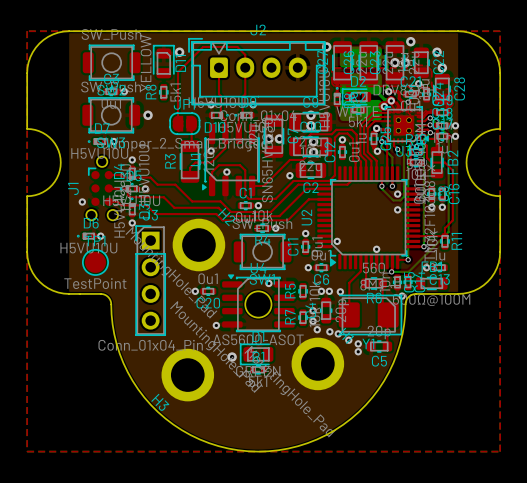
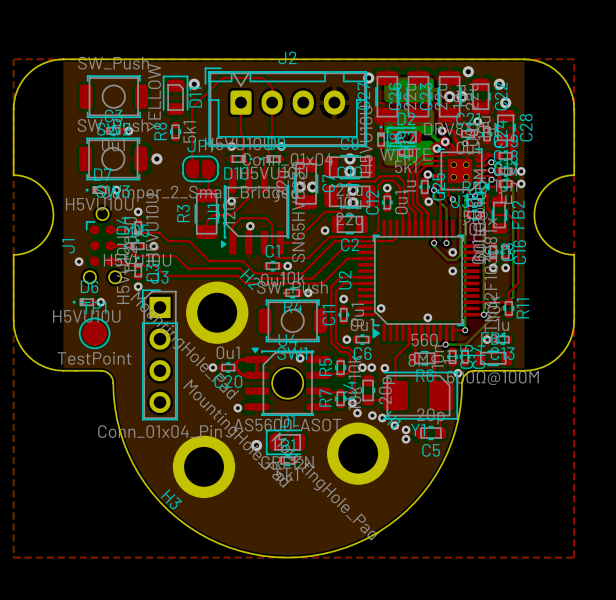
top track: none -> (366, 277) (340, 277) (331, 286) (331, 342) (340, 352) (346, 352) (349, 355) (349, 370) (346, 373) (318, 375)
top track: none -> (366, 283) (343, 283) (335, 291) (335, 341) (342, 347) (348, 347) (354, 353) (354, 388) (350, 392) (318, 391)
top track: none -> (239, 359) (234, 367) (242, 375) (256, 375) (256, 359) (239, 359)
via: (313, 310) -> none

